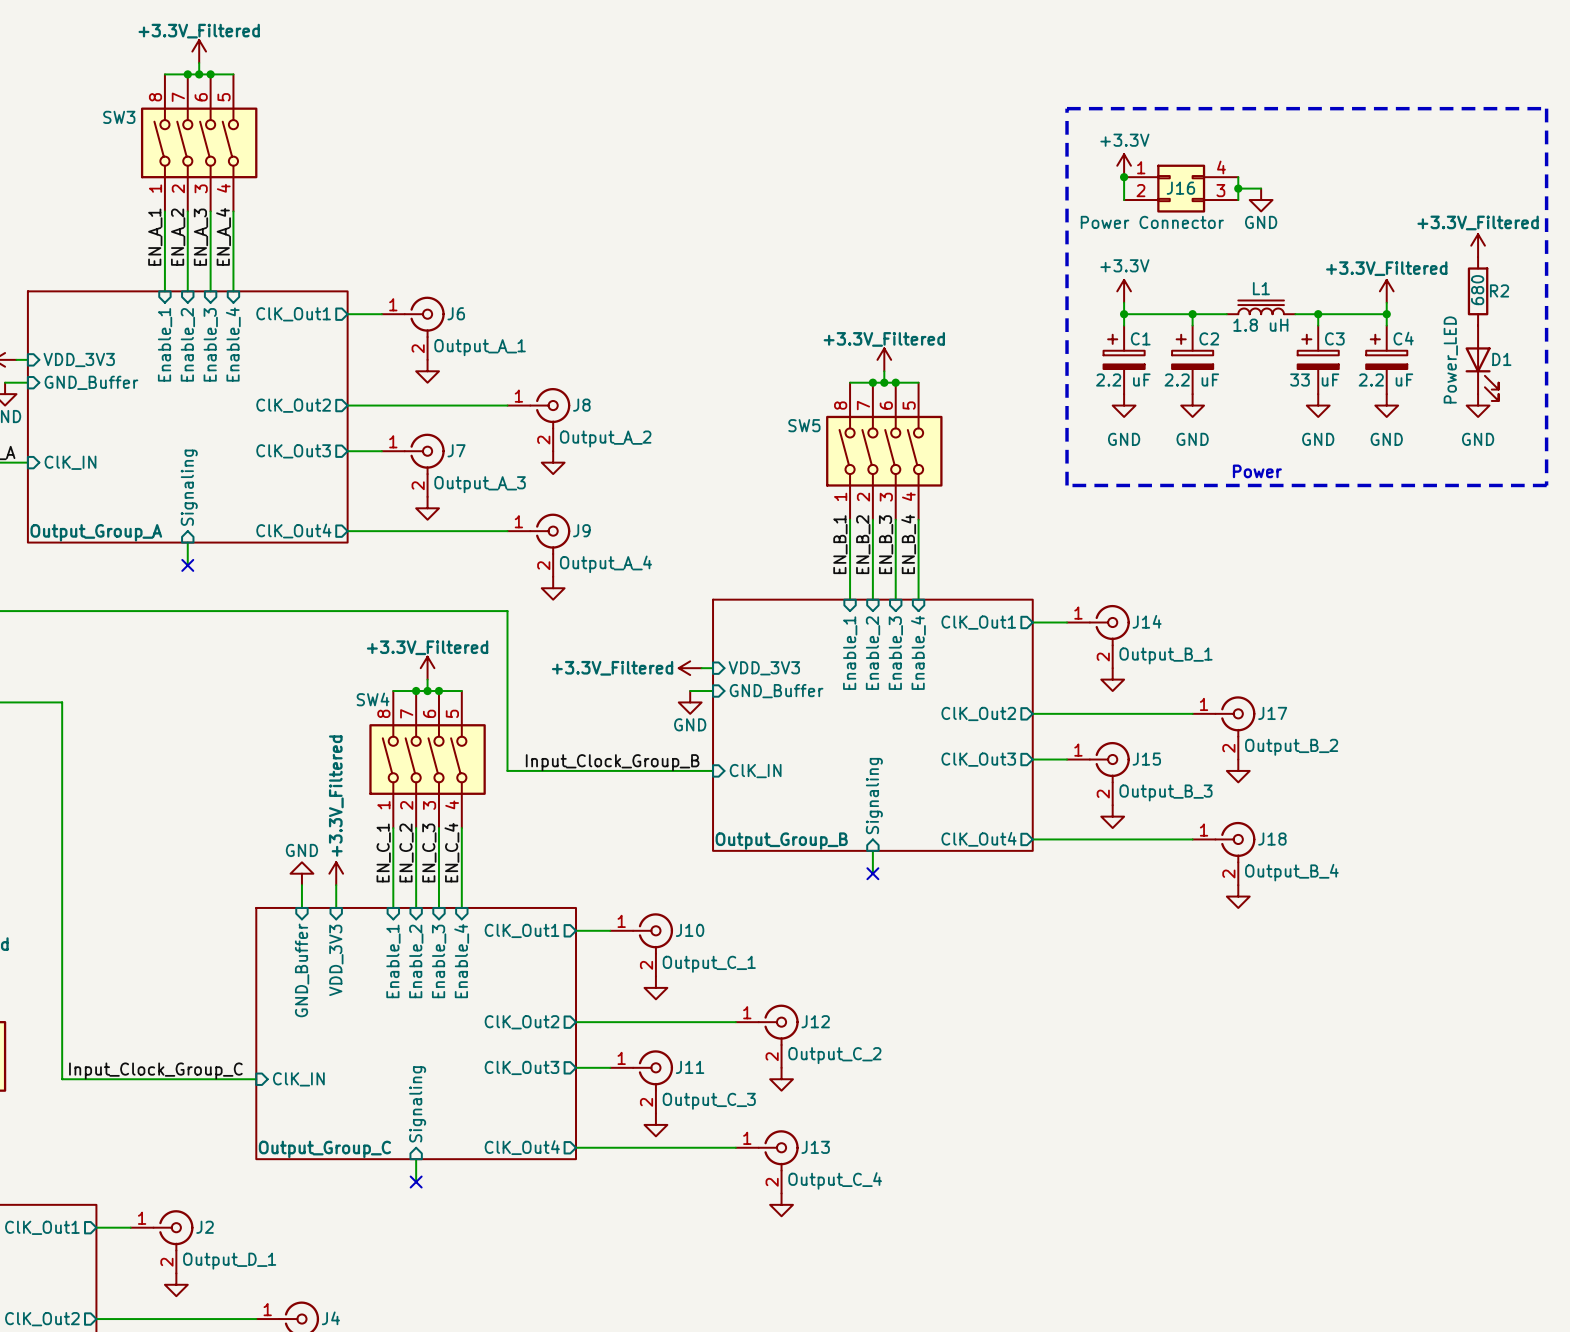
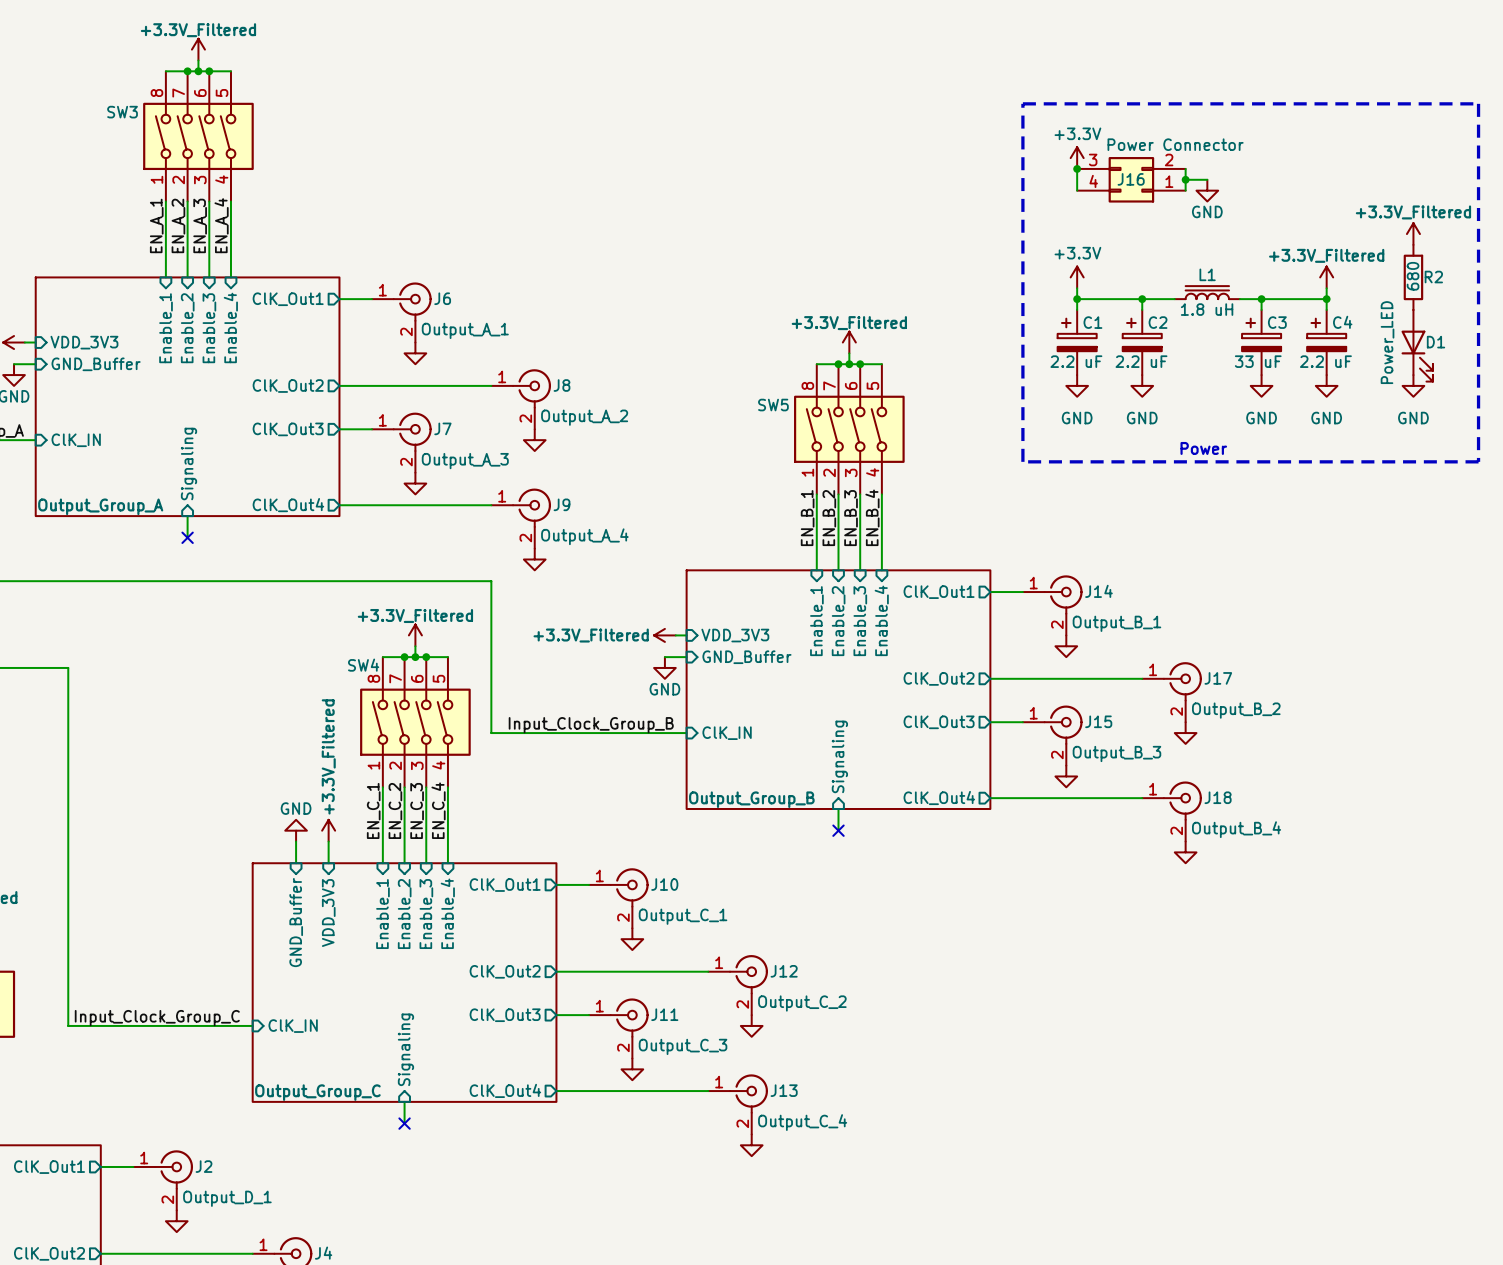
J16 rotation: 0° (1181, 188) -> 180° (1131, 179)

